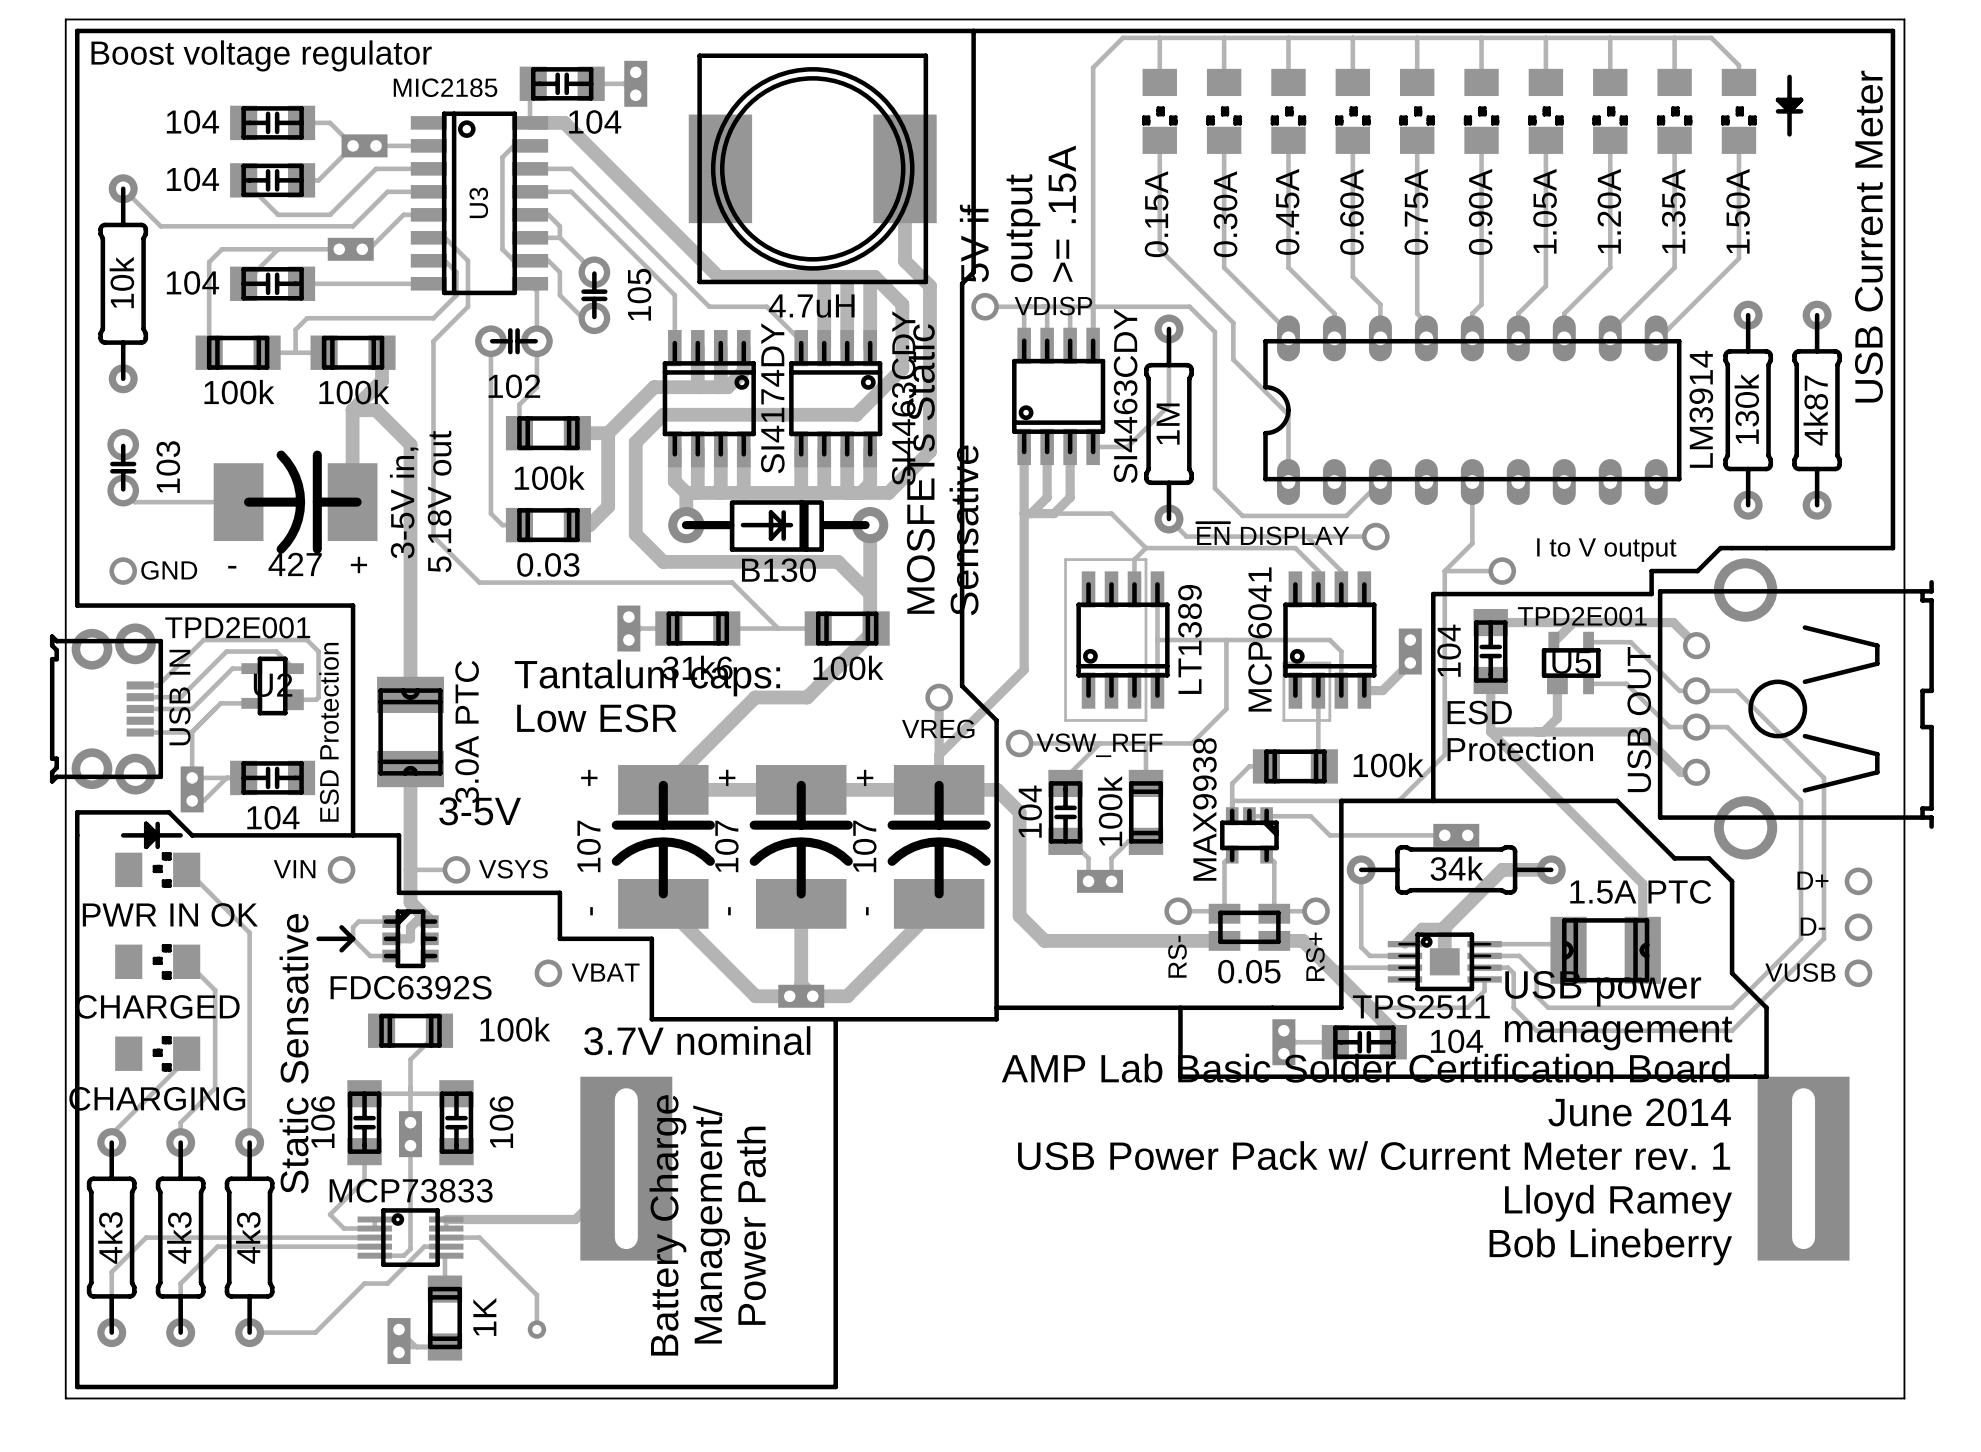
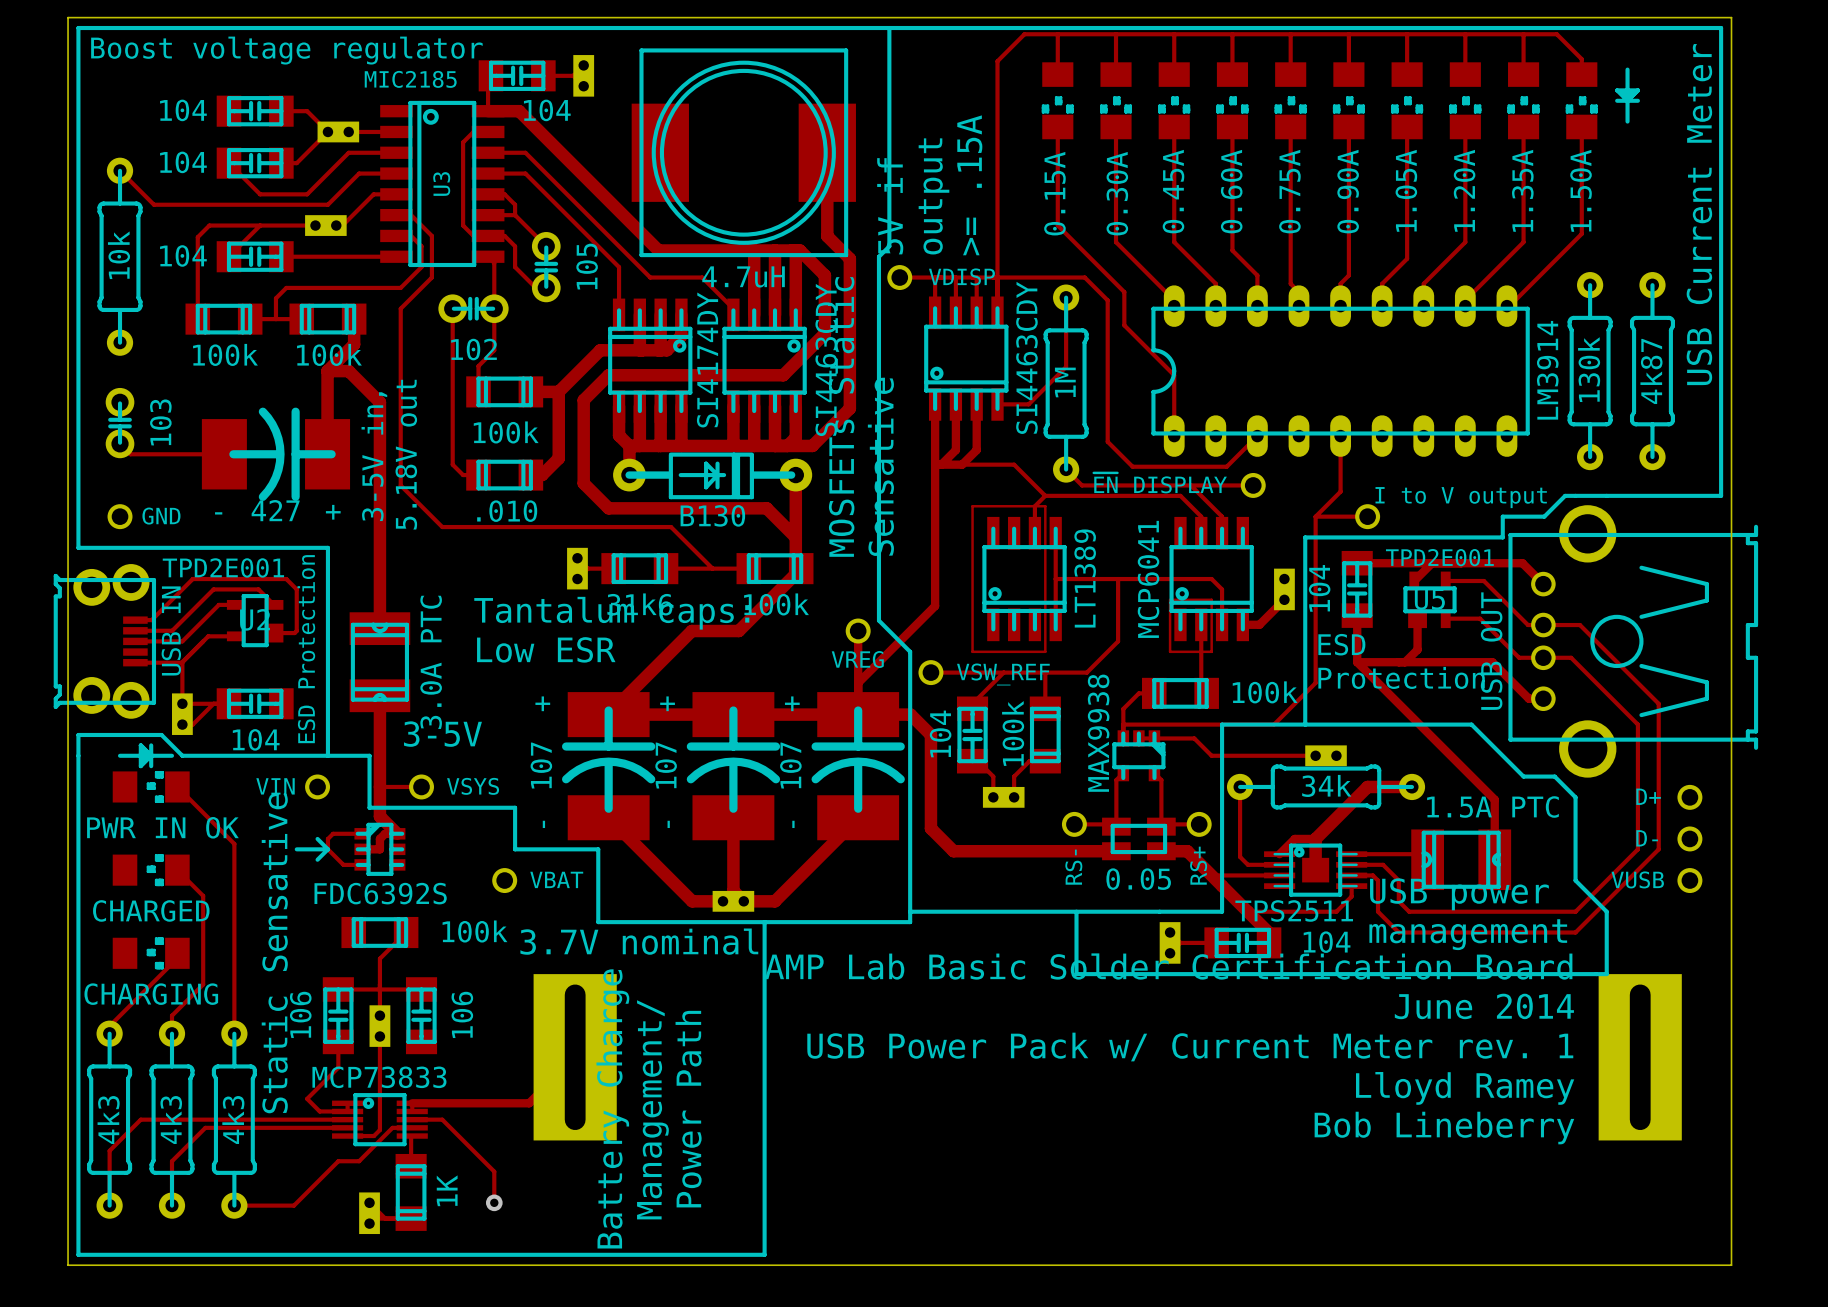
part value: 0.03 (548, 564) -> .010 (507, 511)

